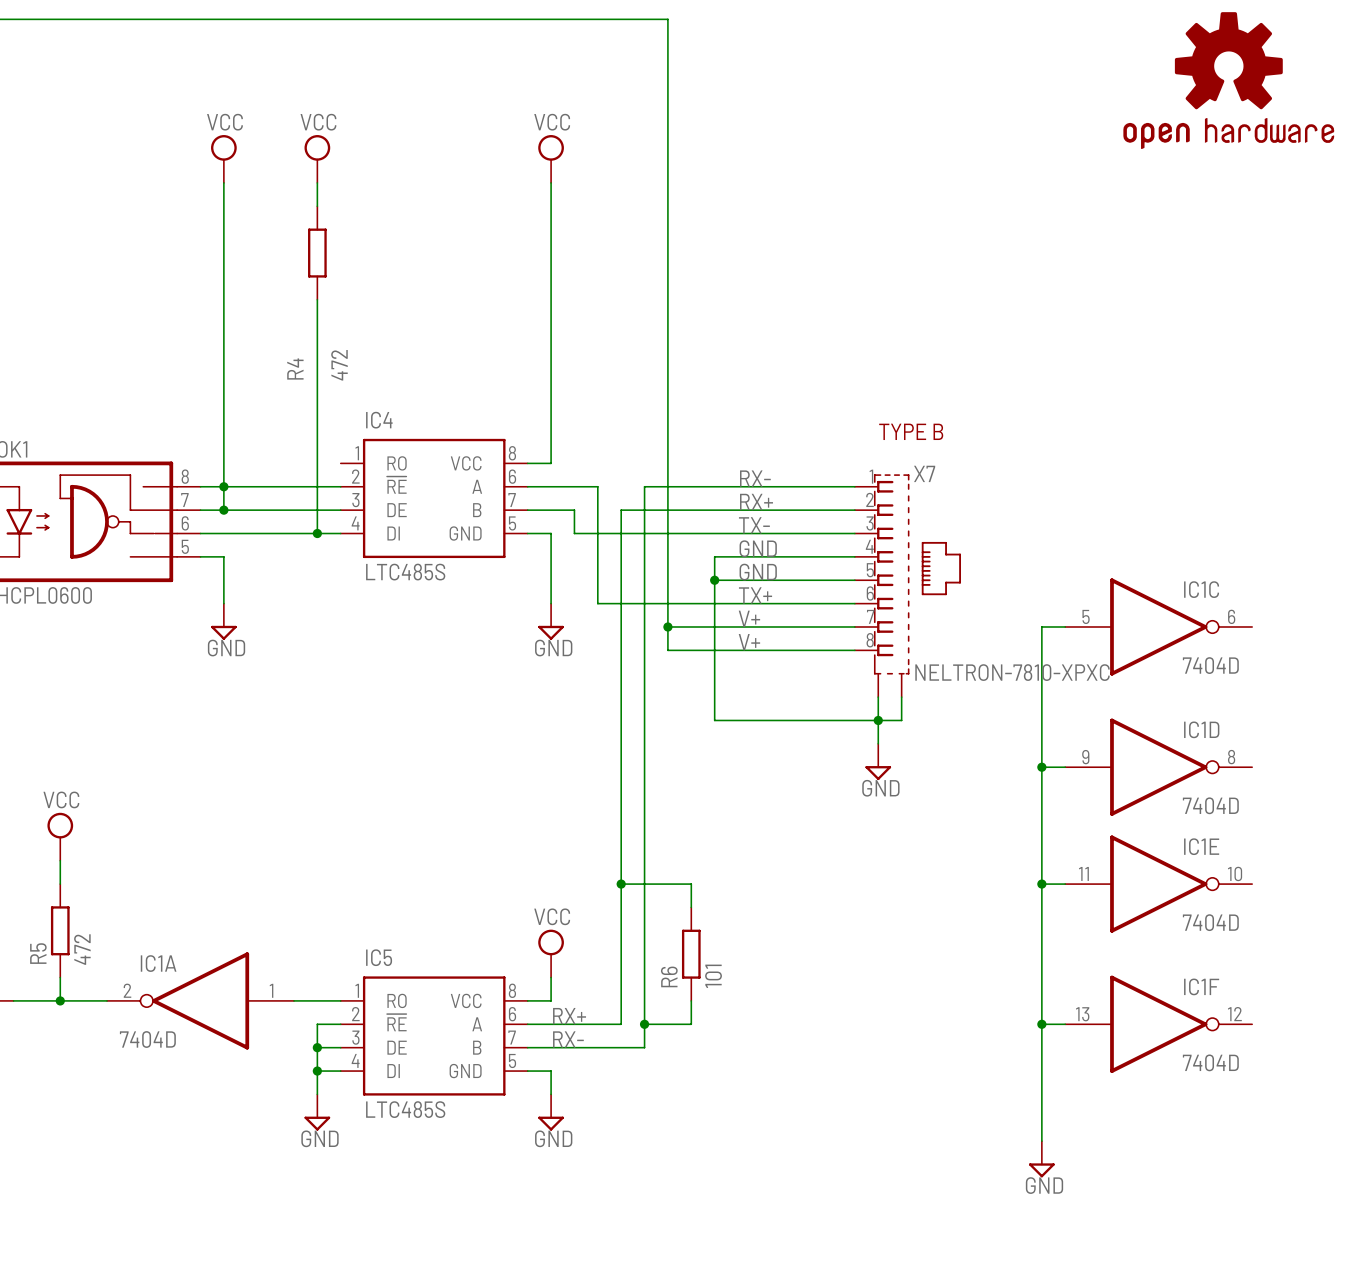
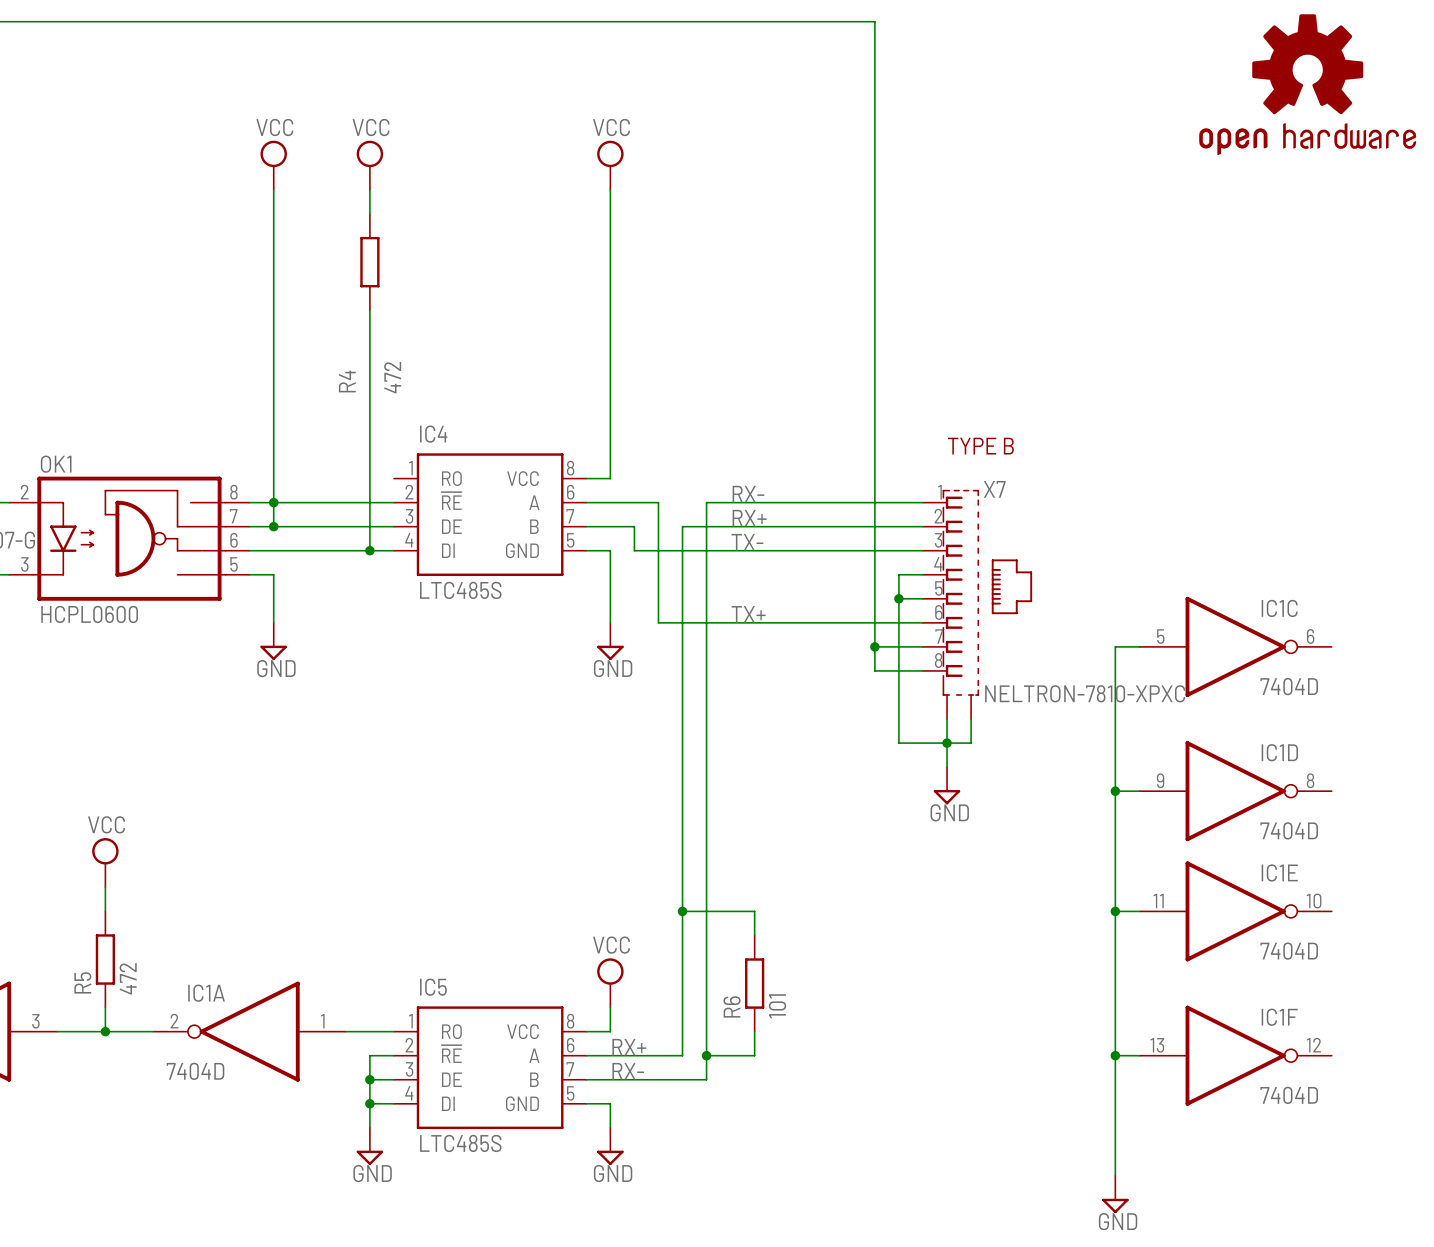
wire: (667, 19) (667, 650) (808, 650) -> (730, 21) (874, 21) (874, 670)
label position: RX- (755, 478) -> RX- (748, 494)
label position: RX+ (756, 501) -> RX+ (749, 518)
label position: TX- (754, 525) -> TX- (747, 542)
label: GND (758, 548) -> none
wire: (831, 556) (714, 556) (714, 720) (831, 720) -> (898, 574) (898, 743)
label: GND (758, 572) -> none
wire: (714, 580) (831, 580) -> none
junction: (714, 580) -> none
junction: none -> (898, 598)
label position: TX+ (755, 595) -> TX+ (748, 614)
label: V+ (749, 618) -> none
wire: (667, 626) (808, 626) -> none
junction: (667, 626) -> none
junction: none -> (874, 646)
label: V+ (749, 642) -> none

